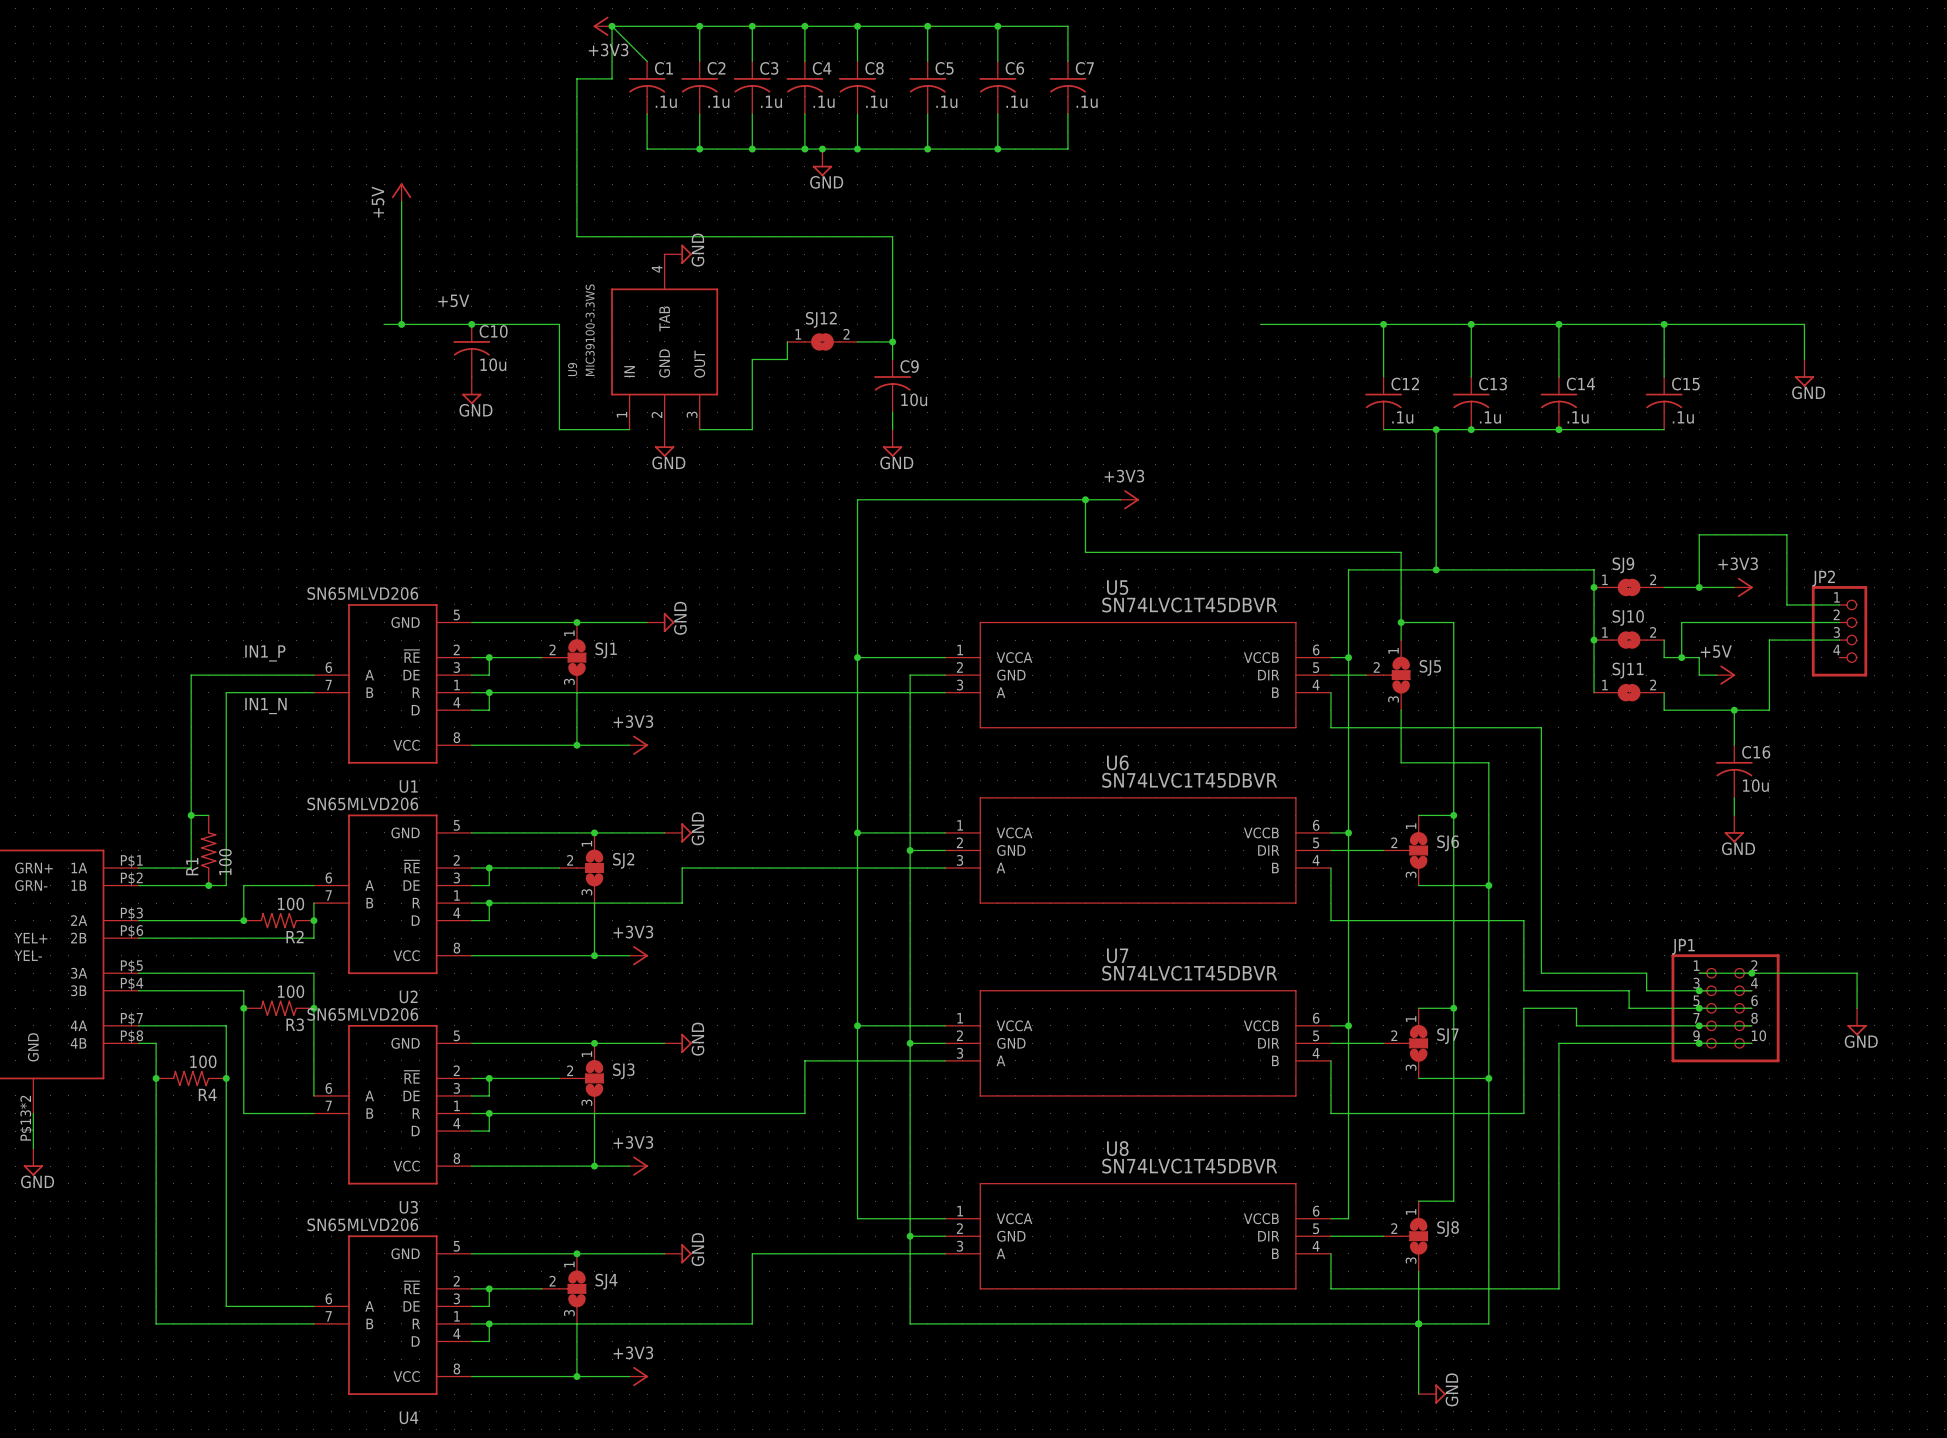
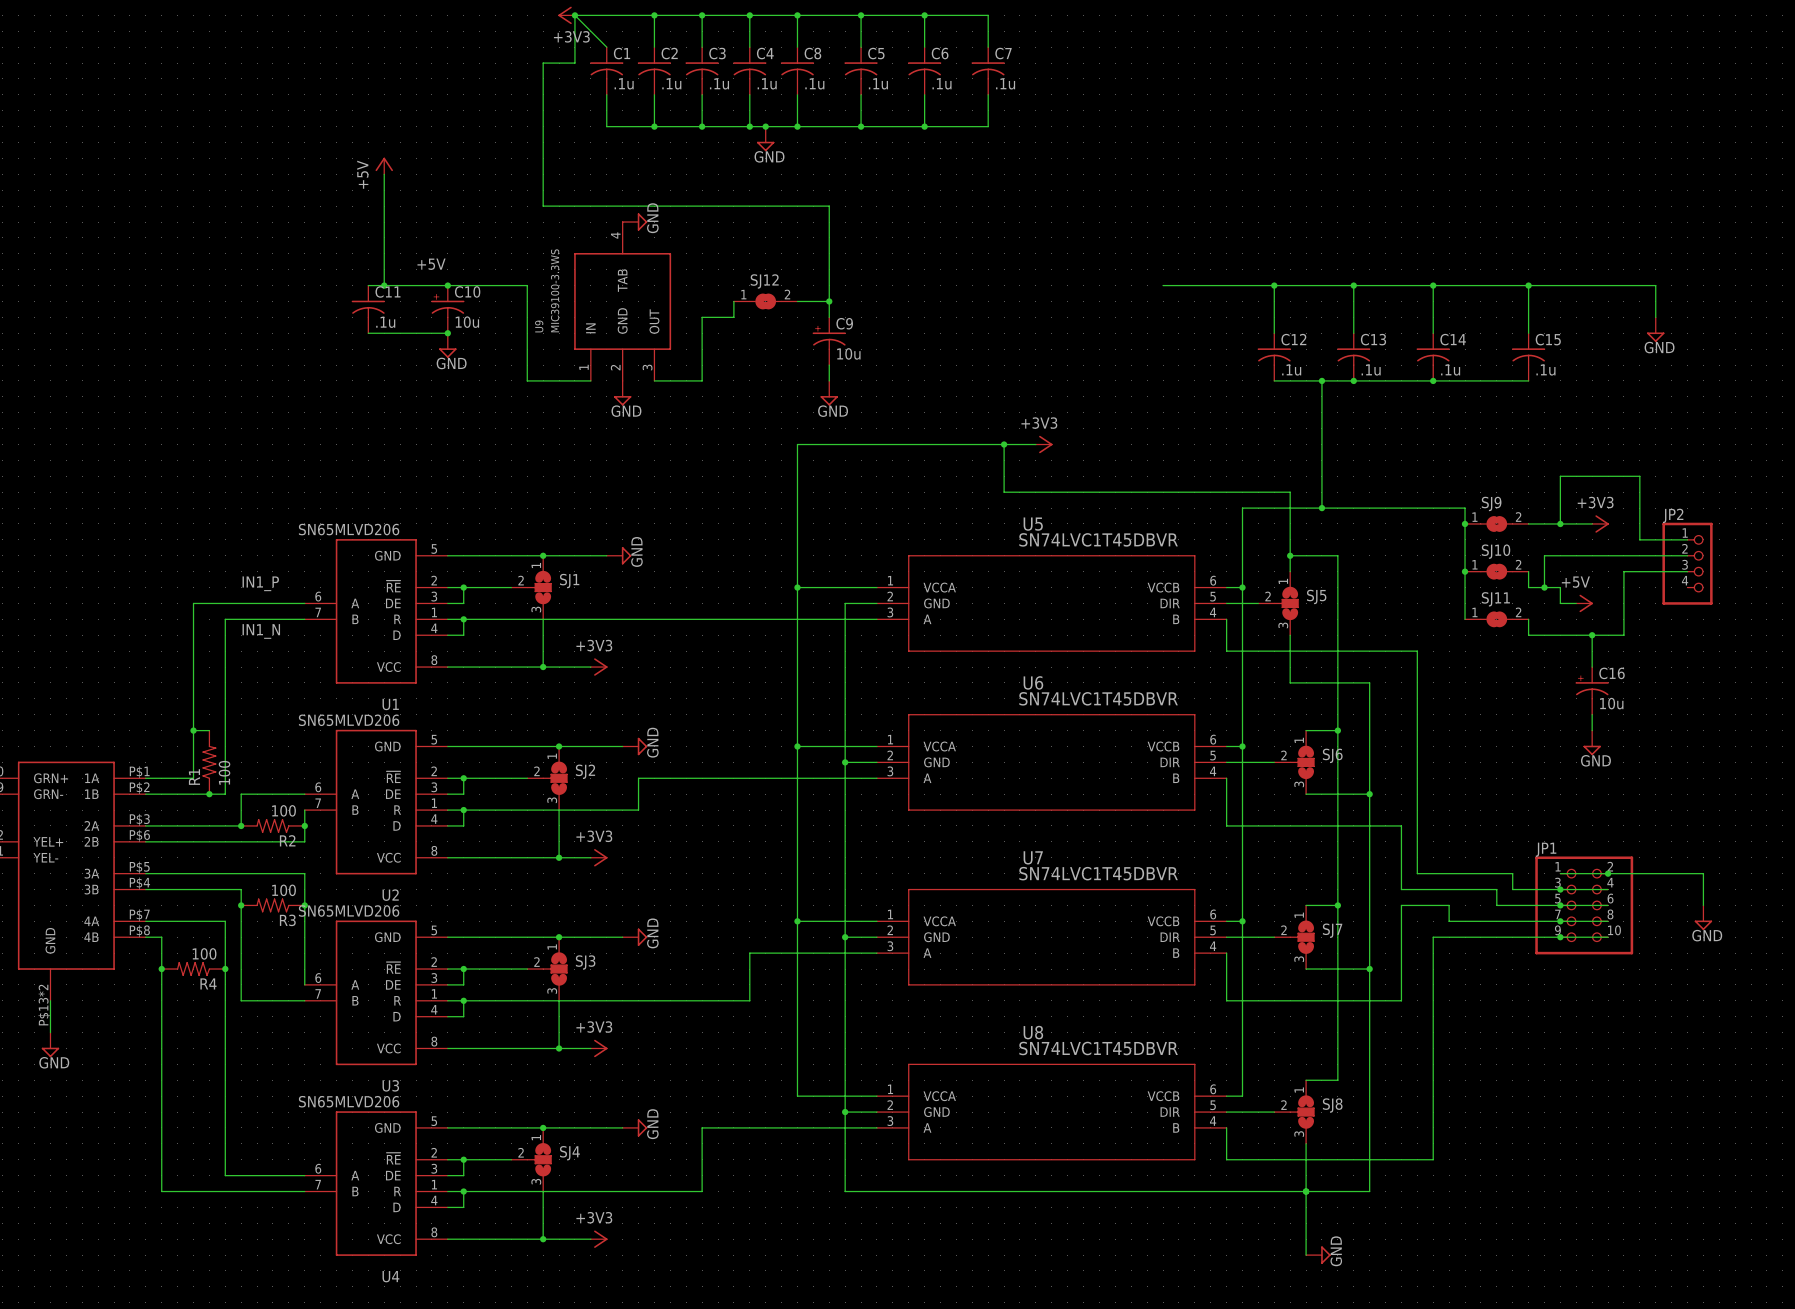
C10 symbol: [453, 324, 491, 378] -> [431, 285, 465, 334]
C11: none -> .1u (368, 309)
C9 symbol: [874, 359, 912, 413] -> [812, 317, 846, 366]
wire: none -> (368, 333) (447, 333)
junction: none -> (447, 333)
C16 symbol: [1715, 745, 1753, 798] -> [1575, 667, 1609, 715]

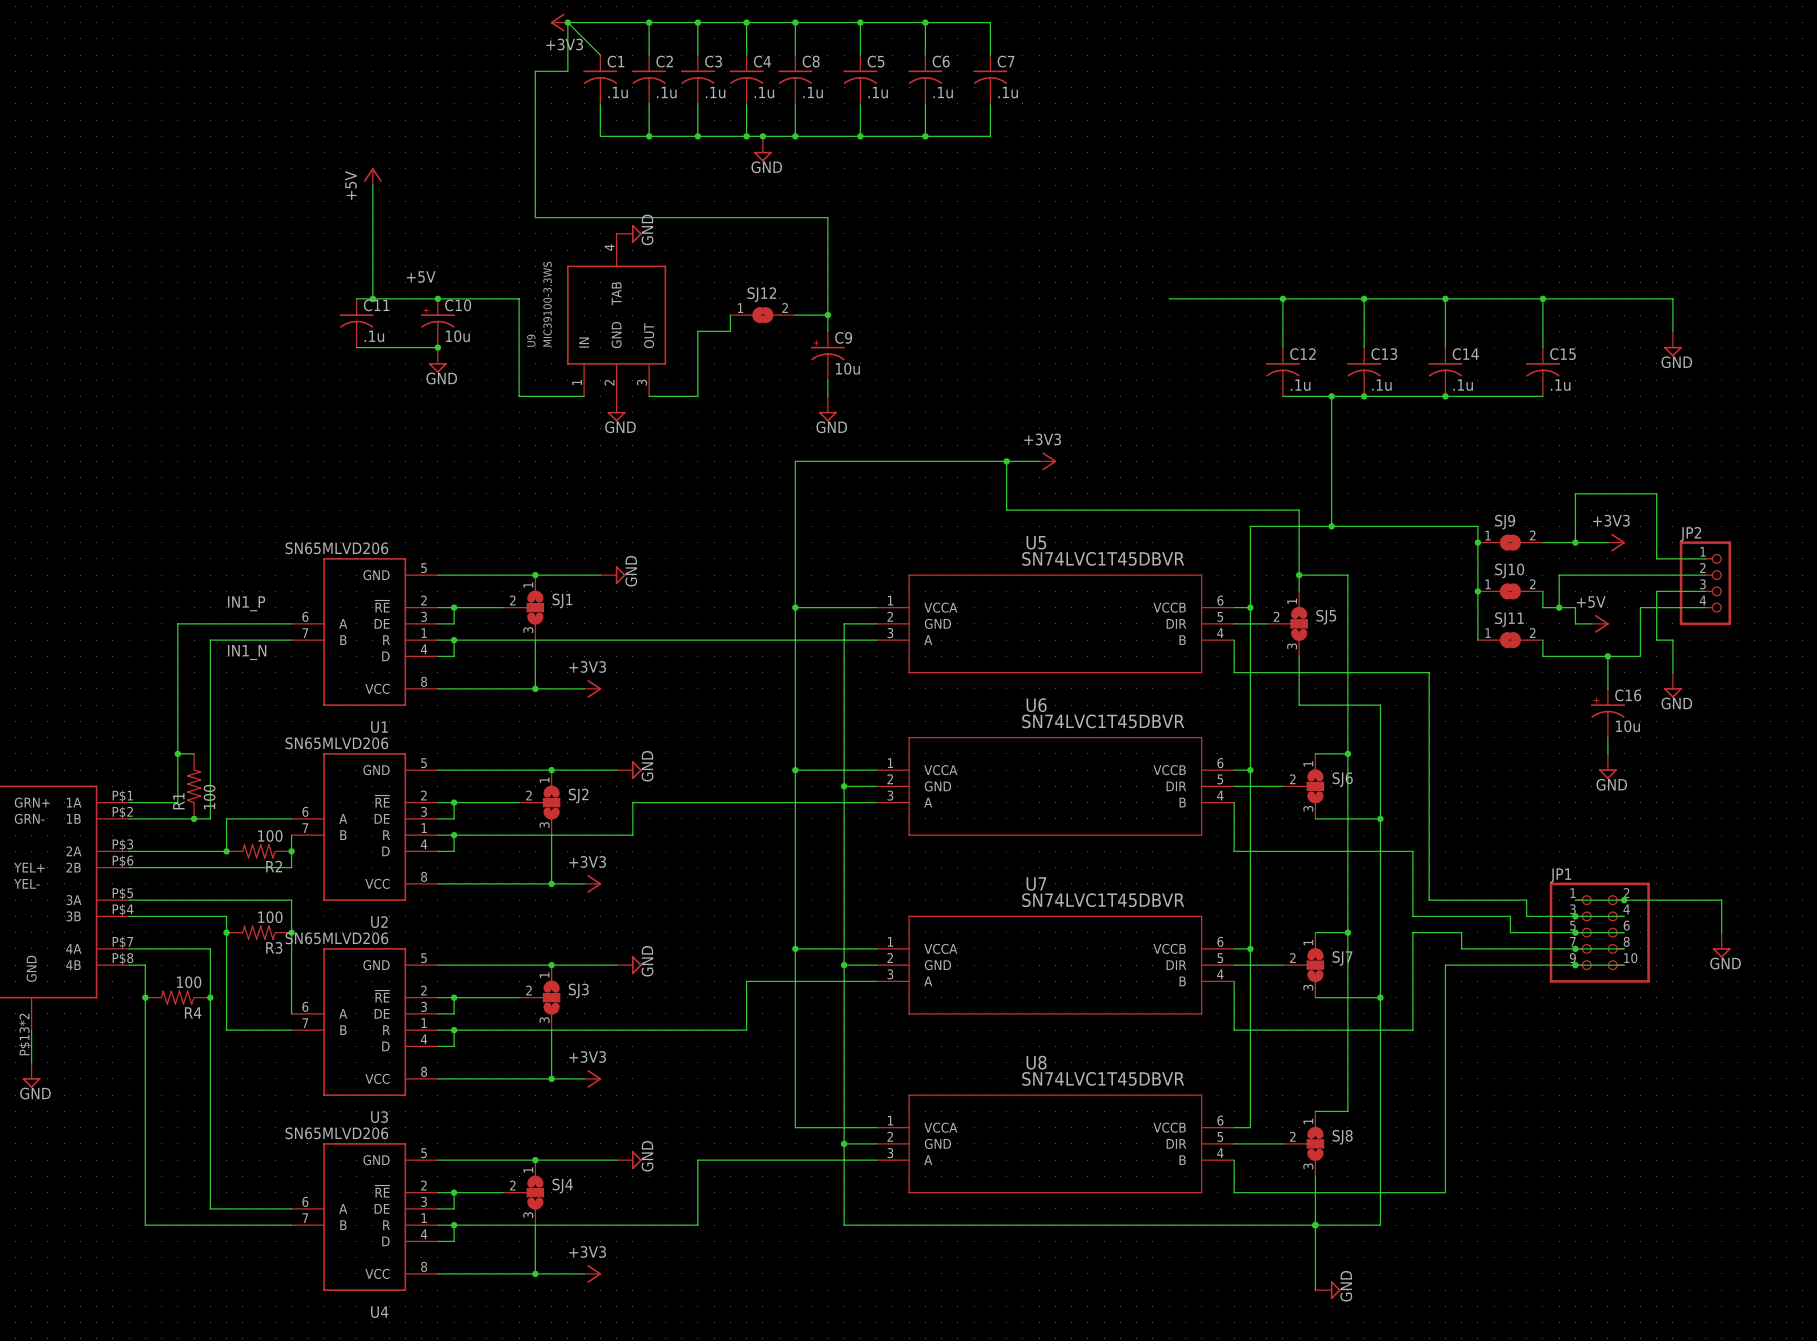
wire: (1639, 571) (1623, 571) (1623, 587) -> (1705, 607) (1640, 607)
wire: none -> (1656, 591) (1656, 640) (1672, 640) (1672, 672)
power symbol: none -> GND (1672, 685)

